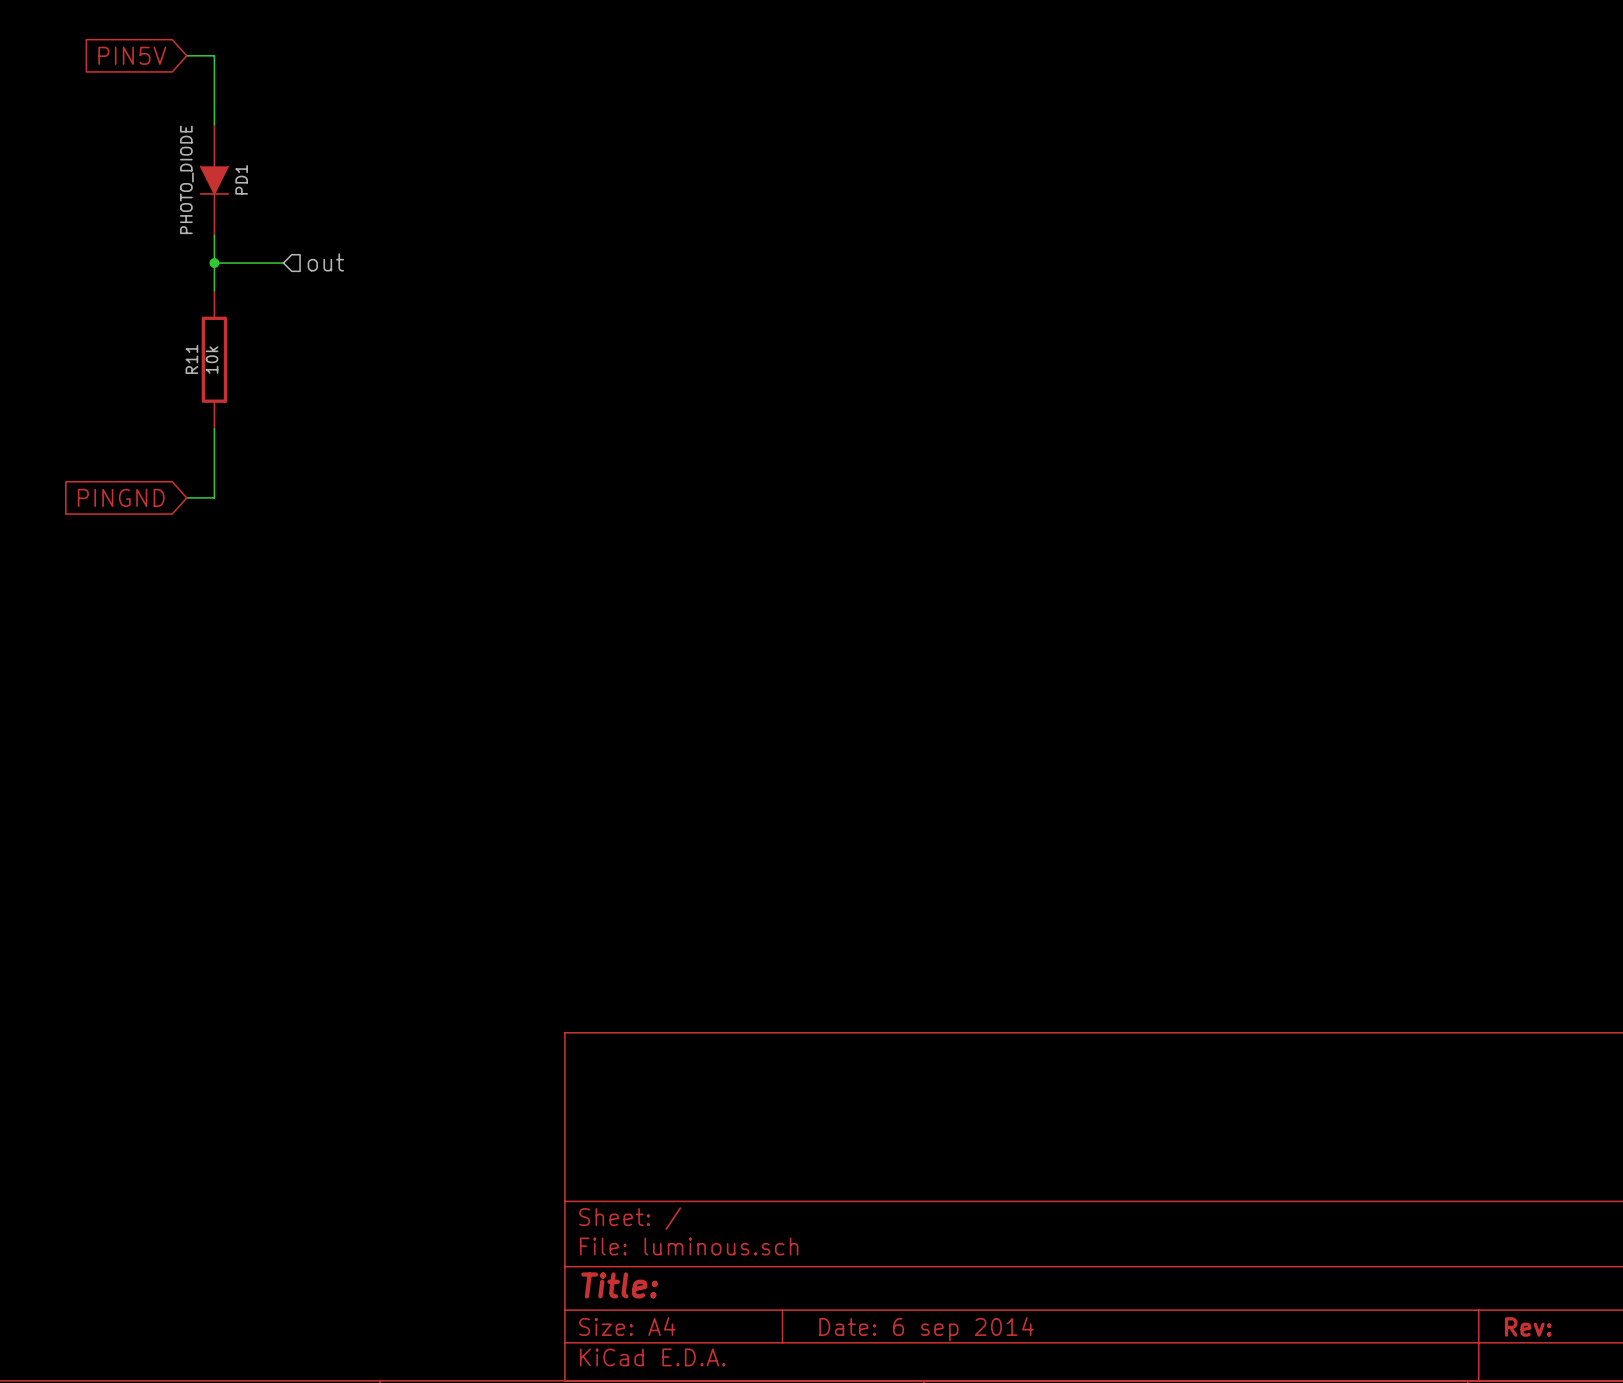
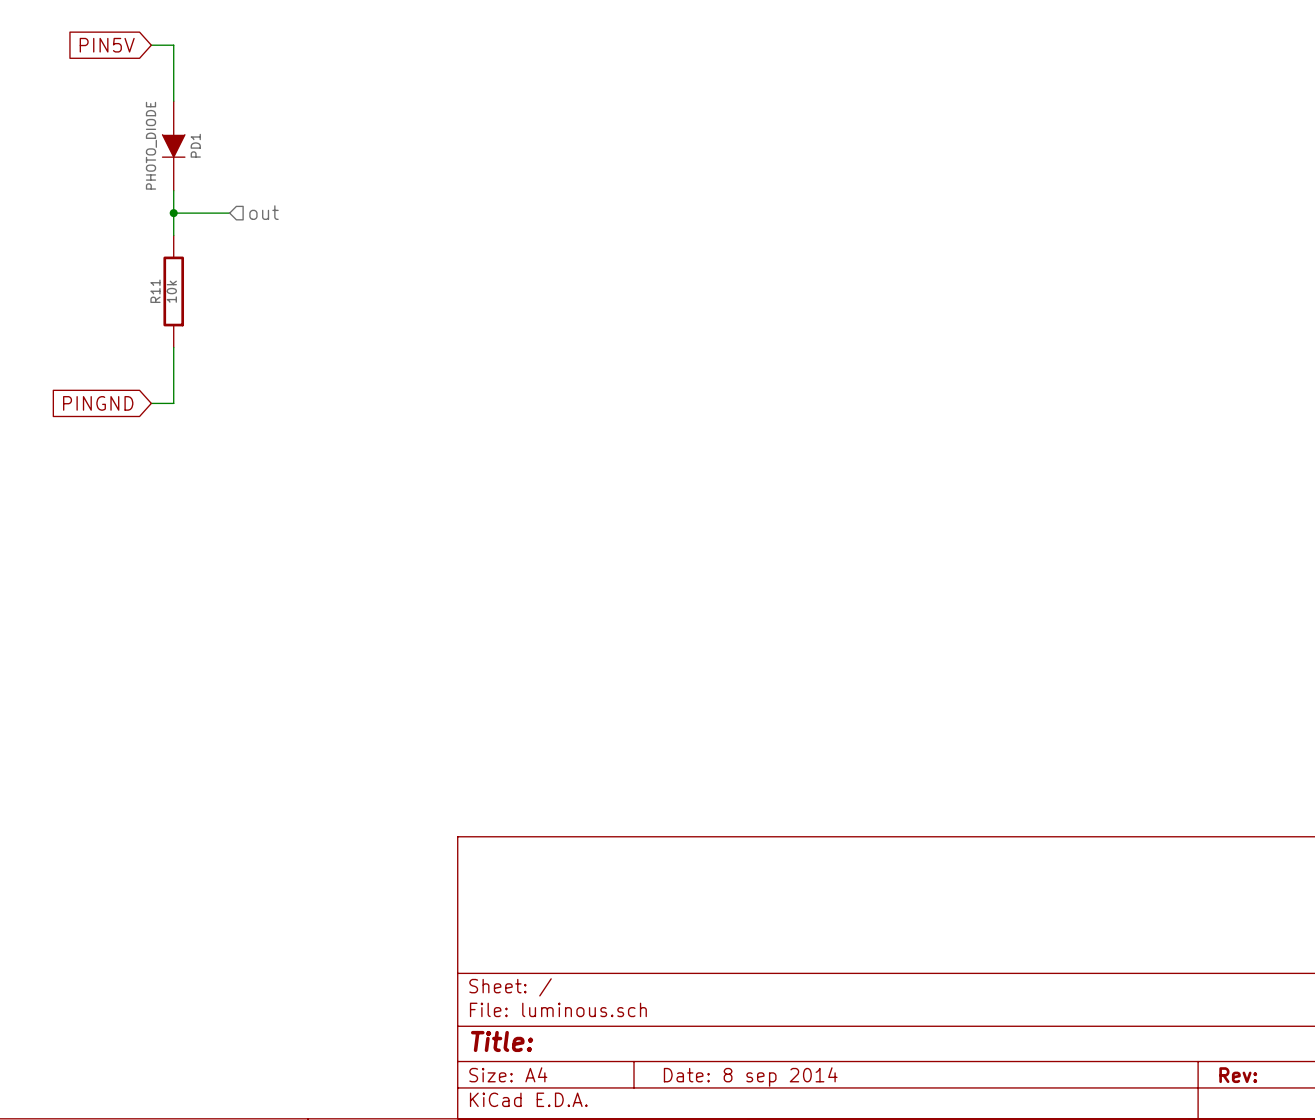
title block: Date: 6 sep 2014 (926, 1329) -> Date: 8 sep 2014 (750, 1077)

